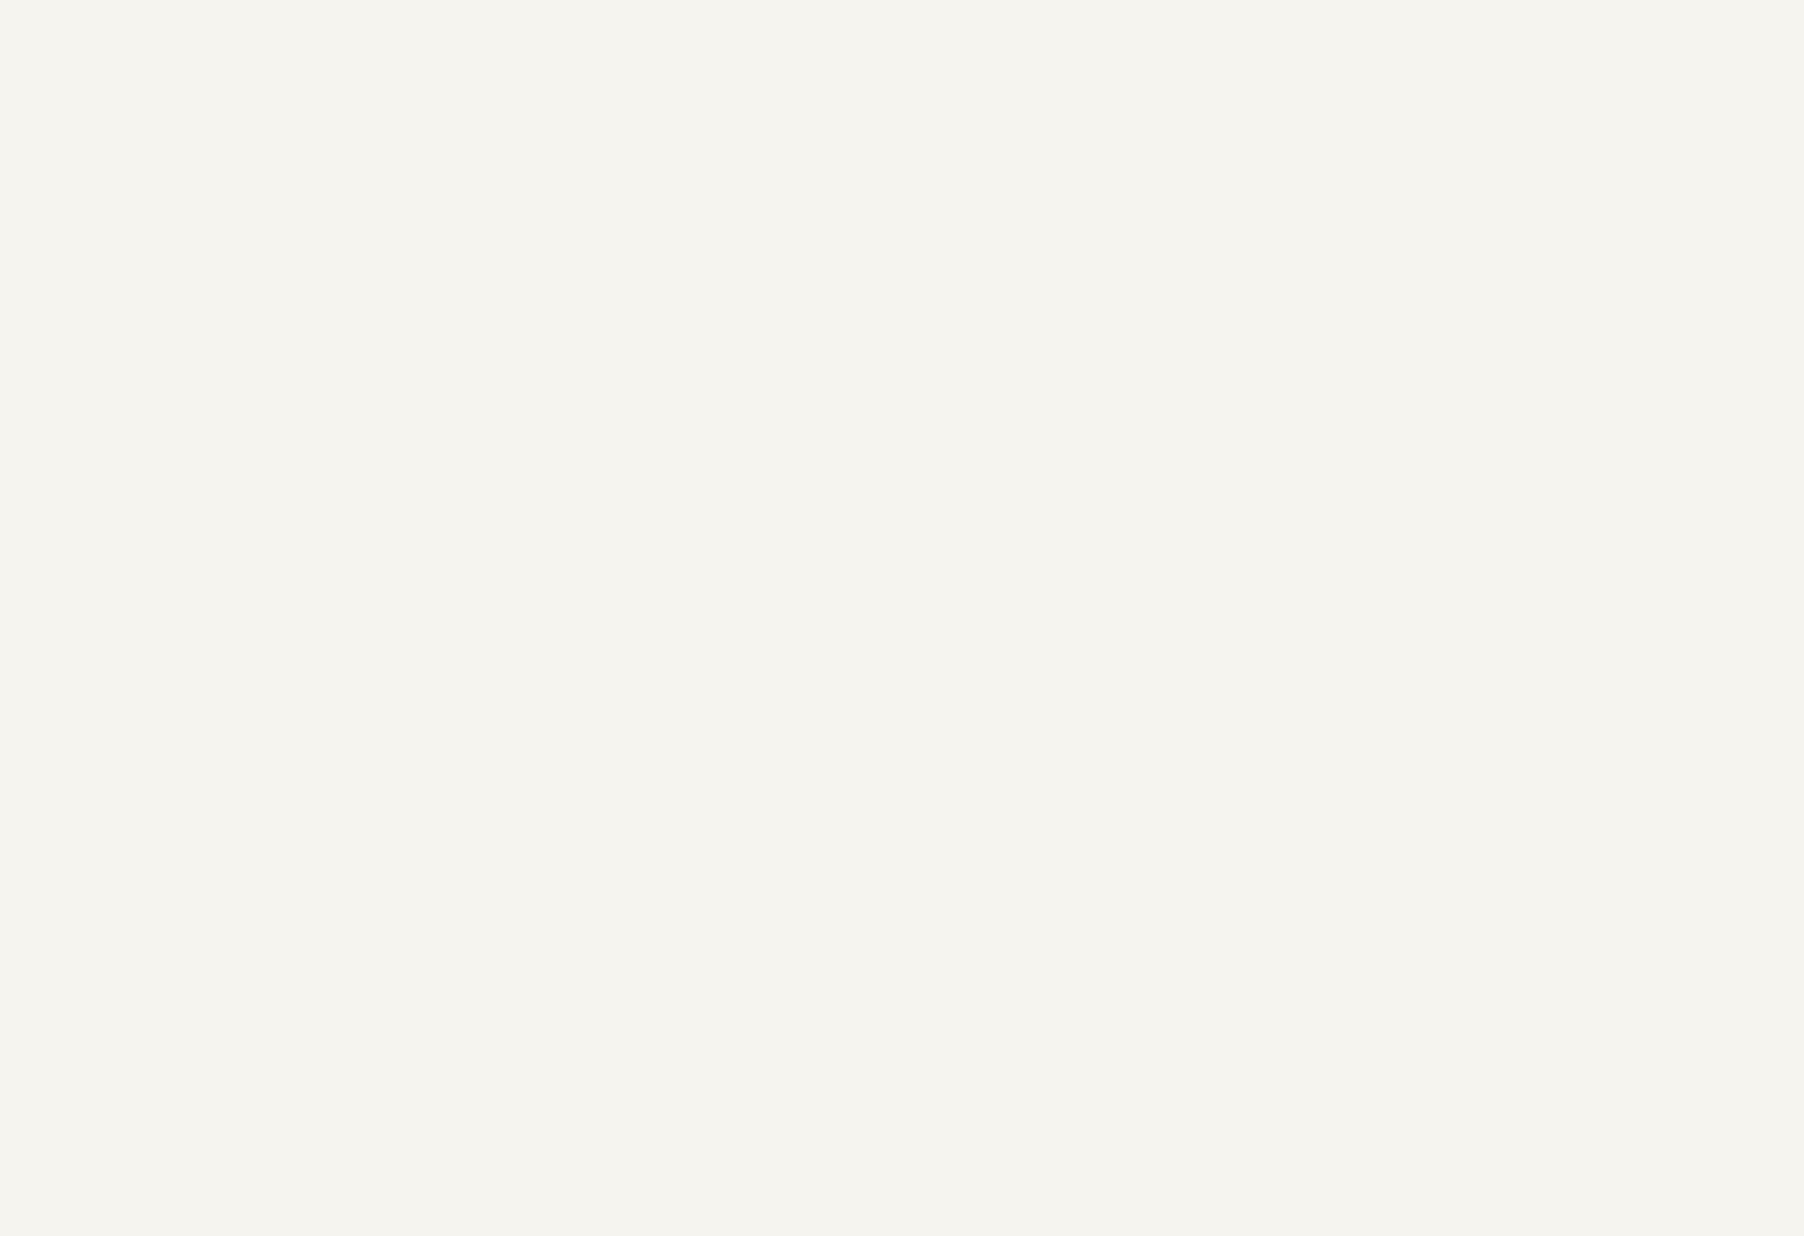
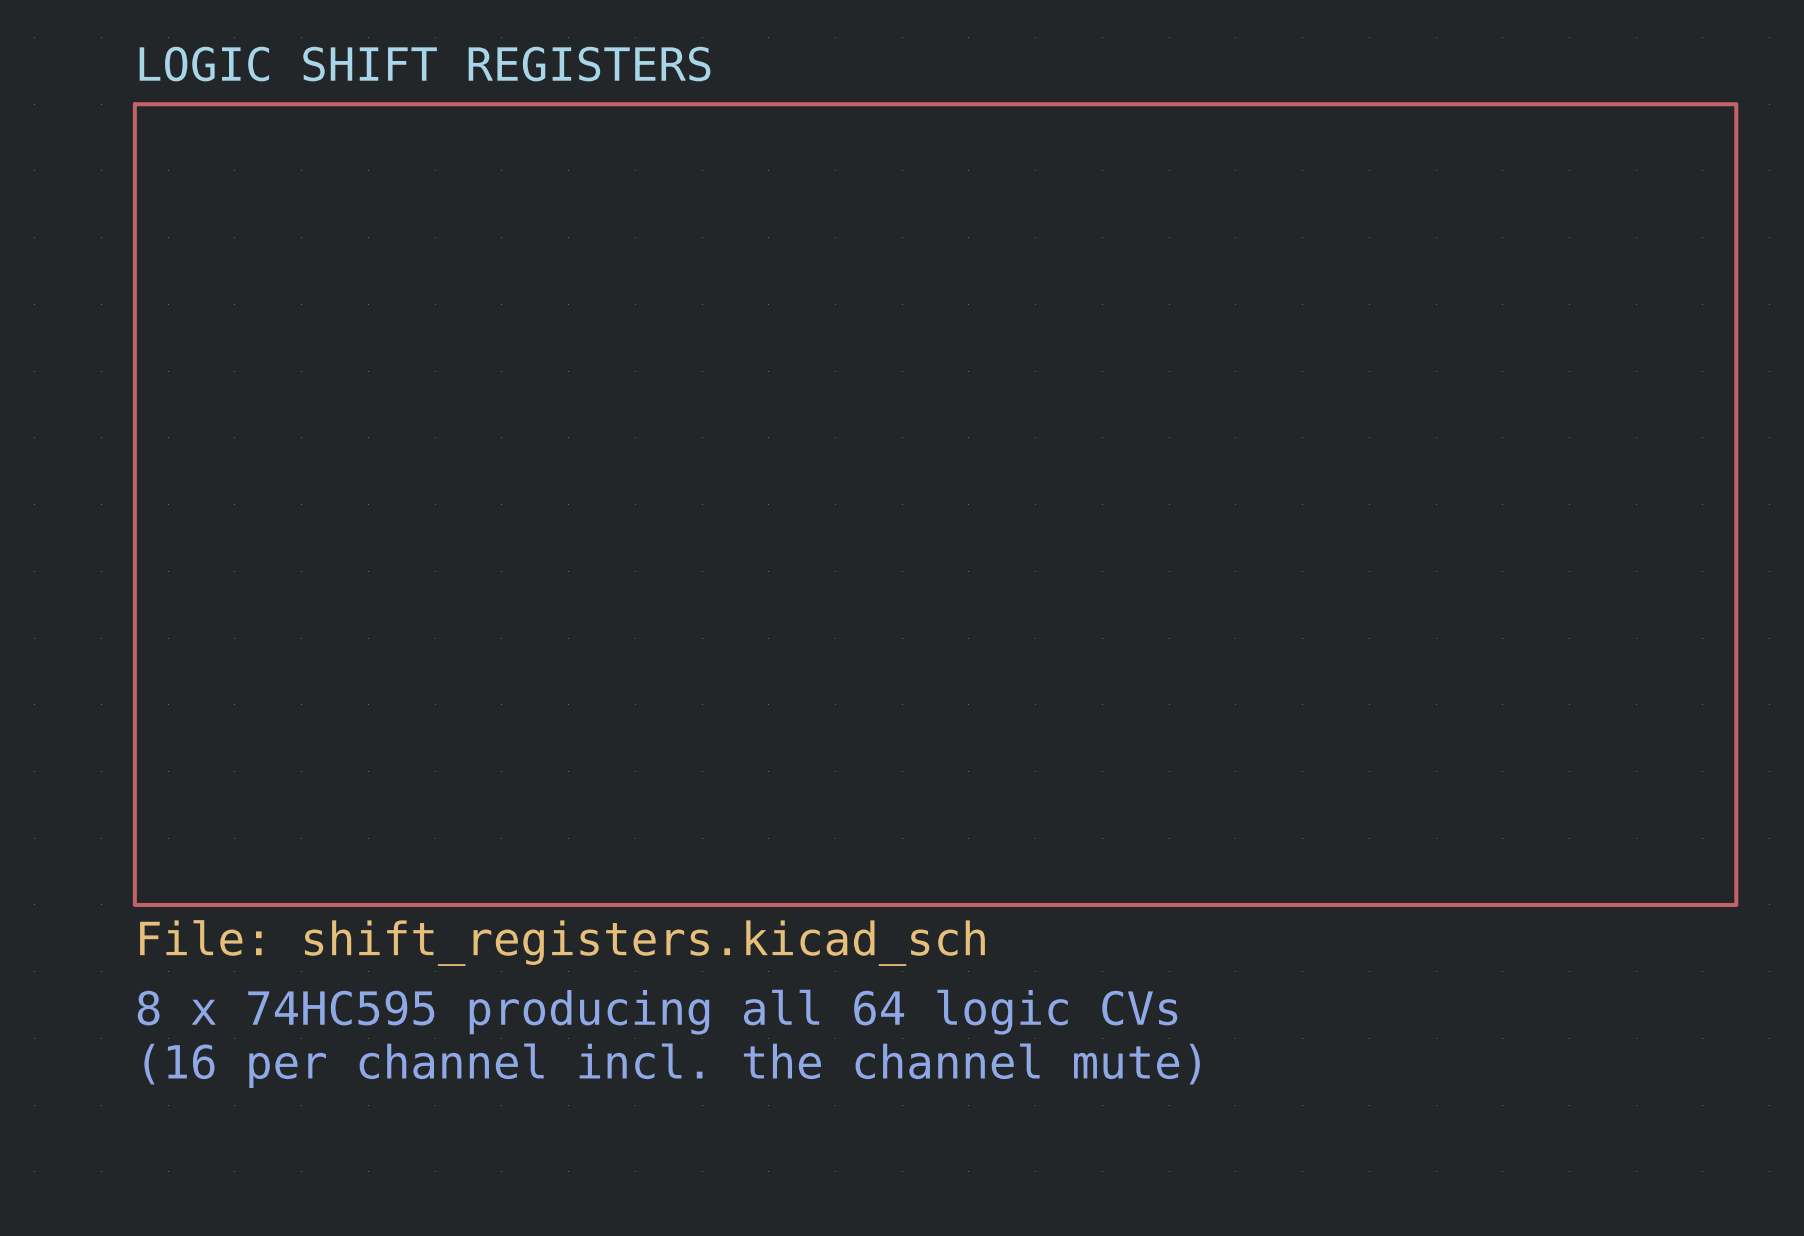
sheet LOGIC SHIFT REGISTERS: none -> File: shift_registers.kicad_sch (935, 504)
text: none -> 8 x 74HC595 producing all 64 logic CVs (657, 1012)
text: none -> (16 per channel incl. the channel mute) (672, 1065)

